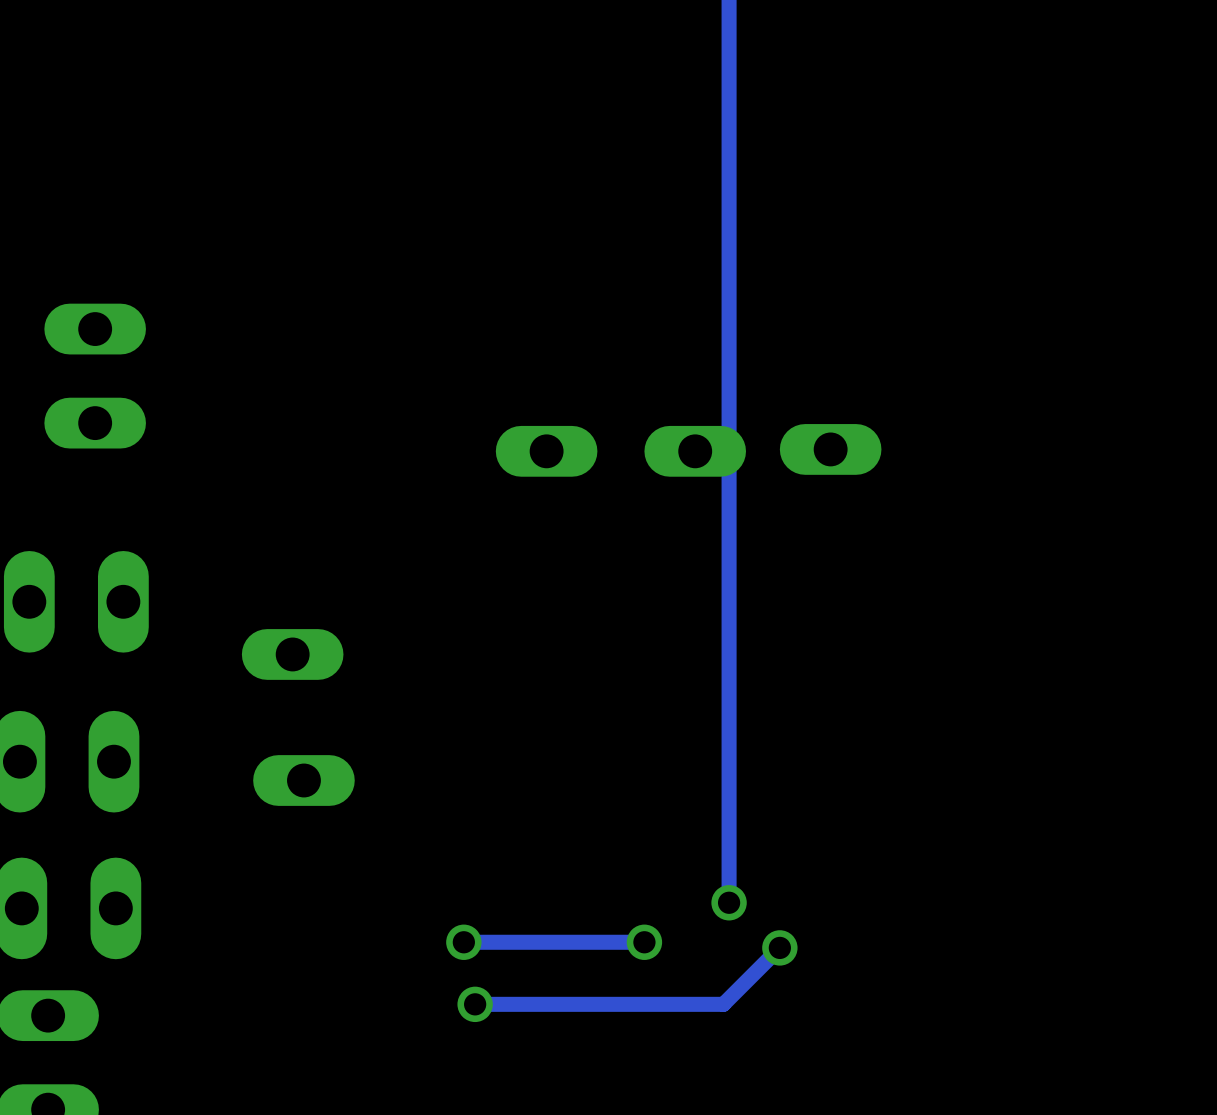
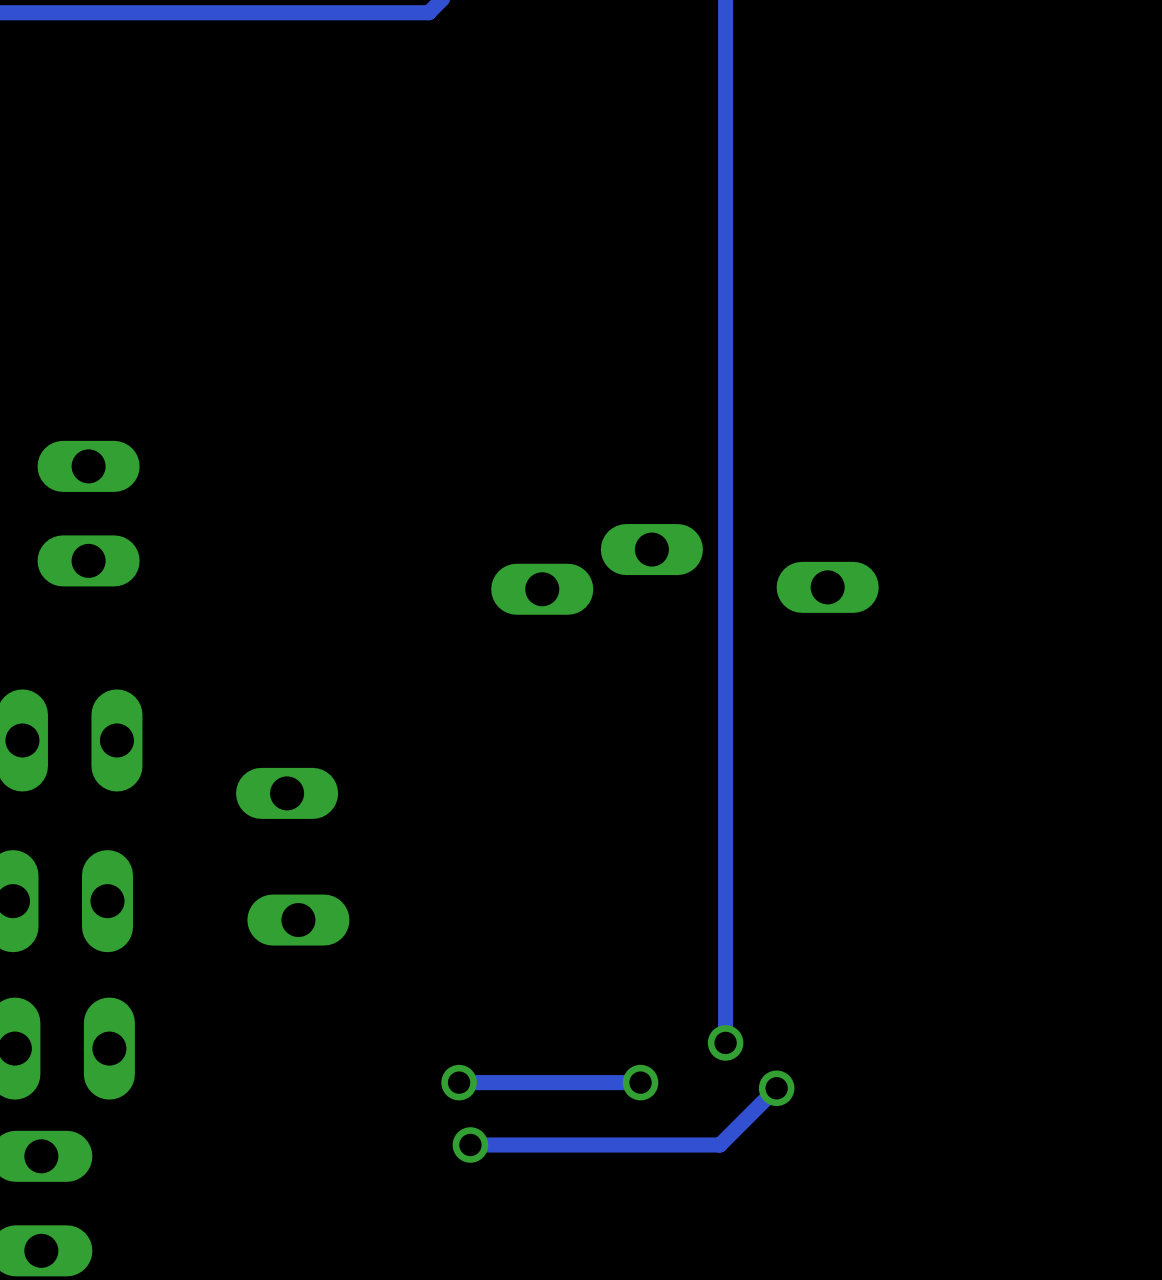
part position: (695, 451) -> (651, 549)

